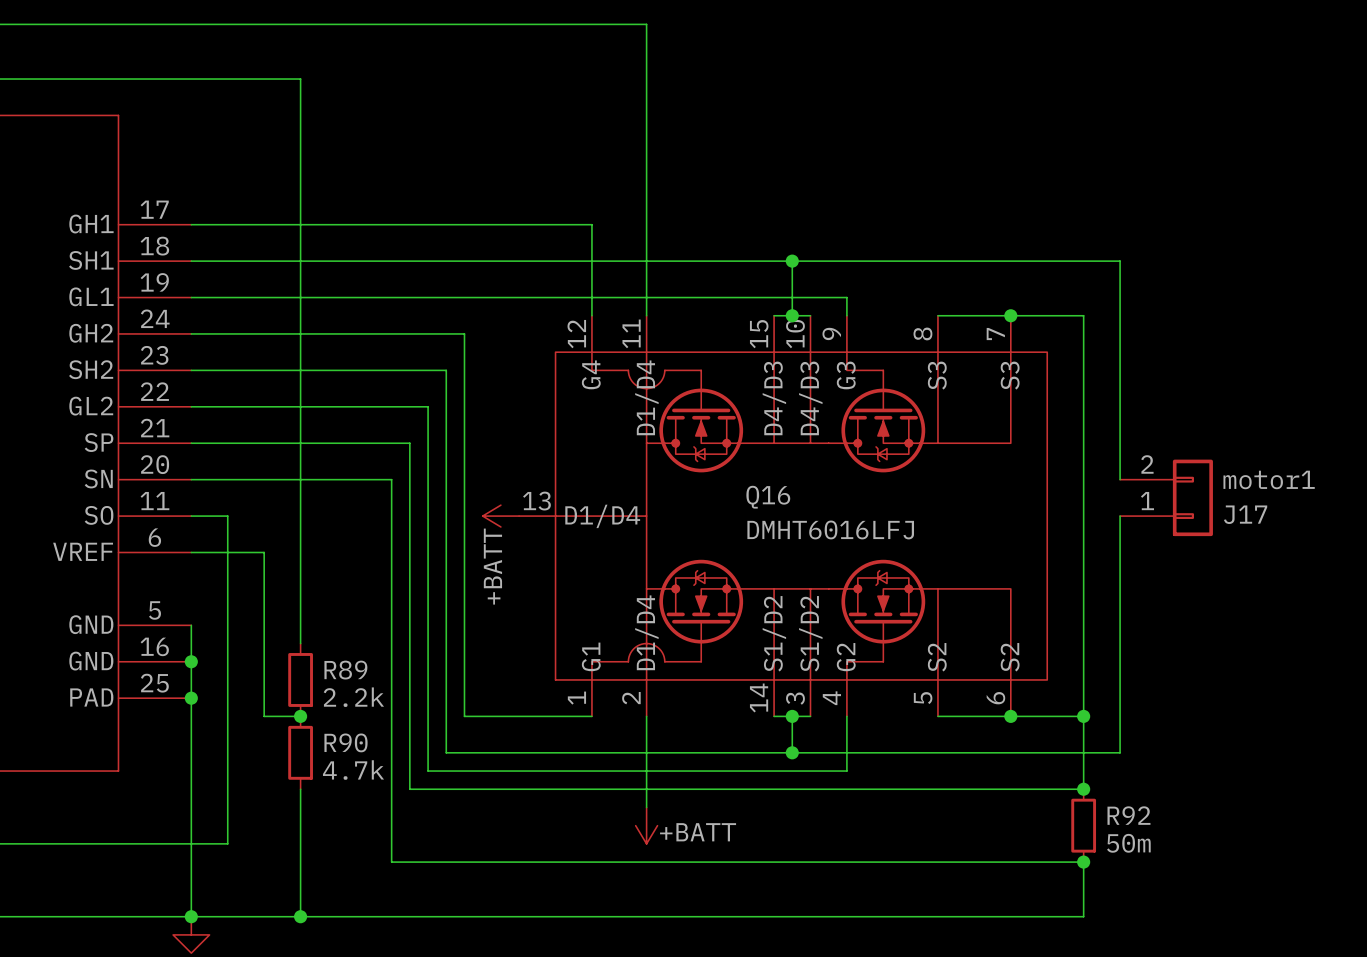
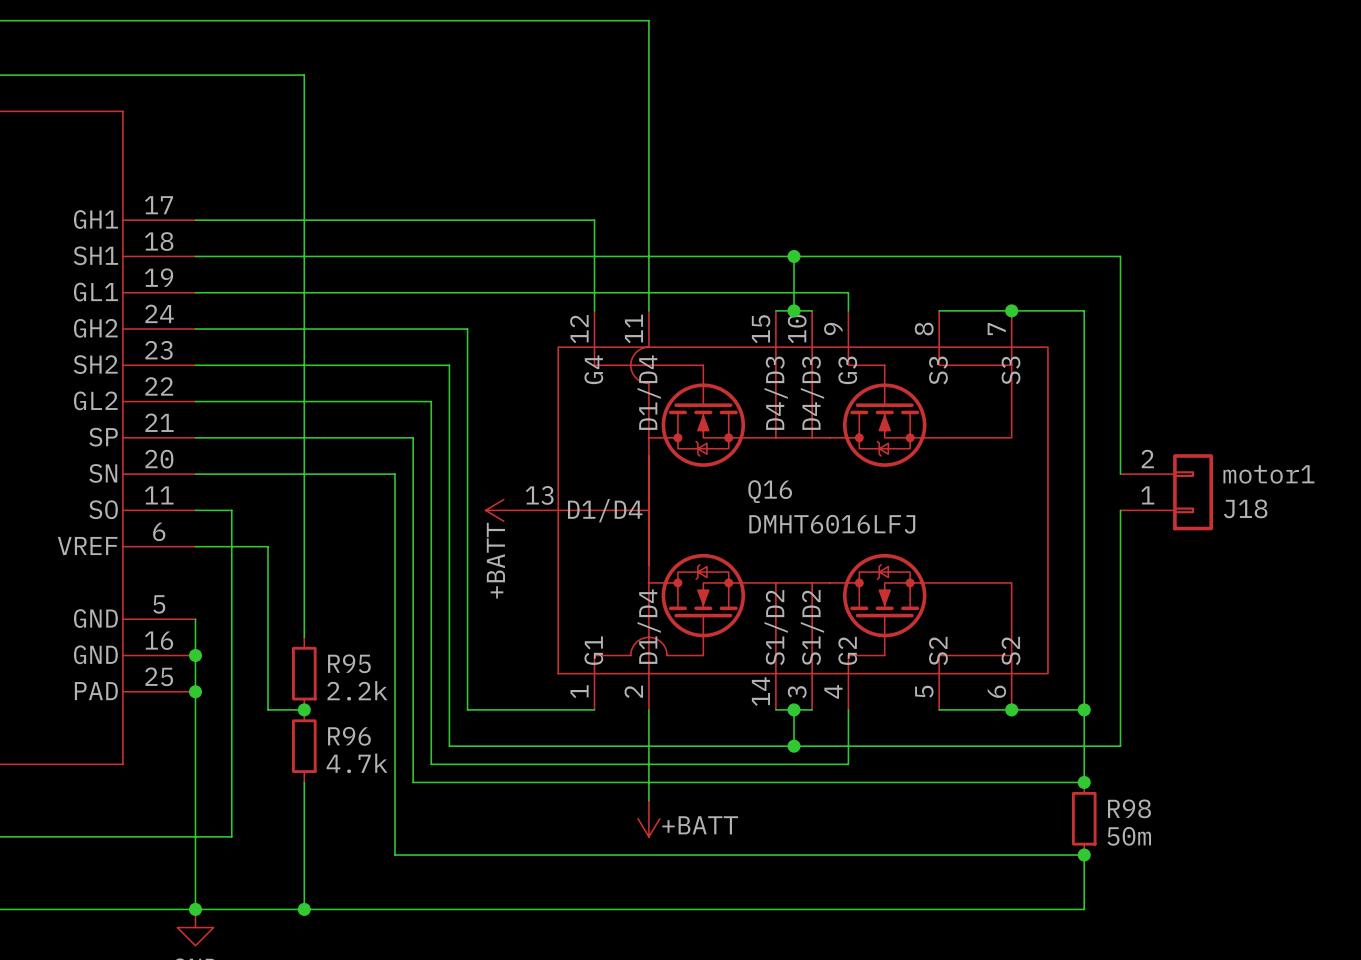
Q16 symbol: [519, 315, 1048, 717] -> [521, 310, 1048, 710]
J17 name: J17 (1245, 514) -> J18 (1245, 508)
R89 name: R89 (345, 670) -> R95 (349, 663)
R90 name: R90 (346, 742) -> R96 (349, 736)
R92 name: R92 (1128, 815) -> R98 (1129, 808)

